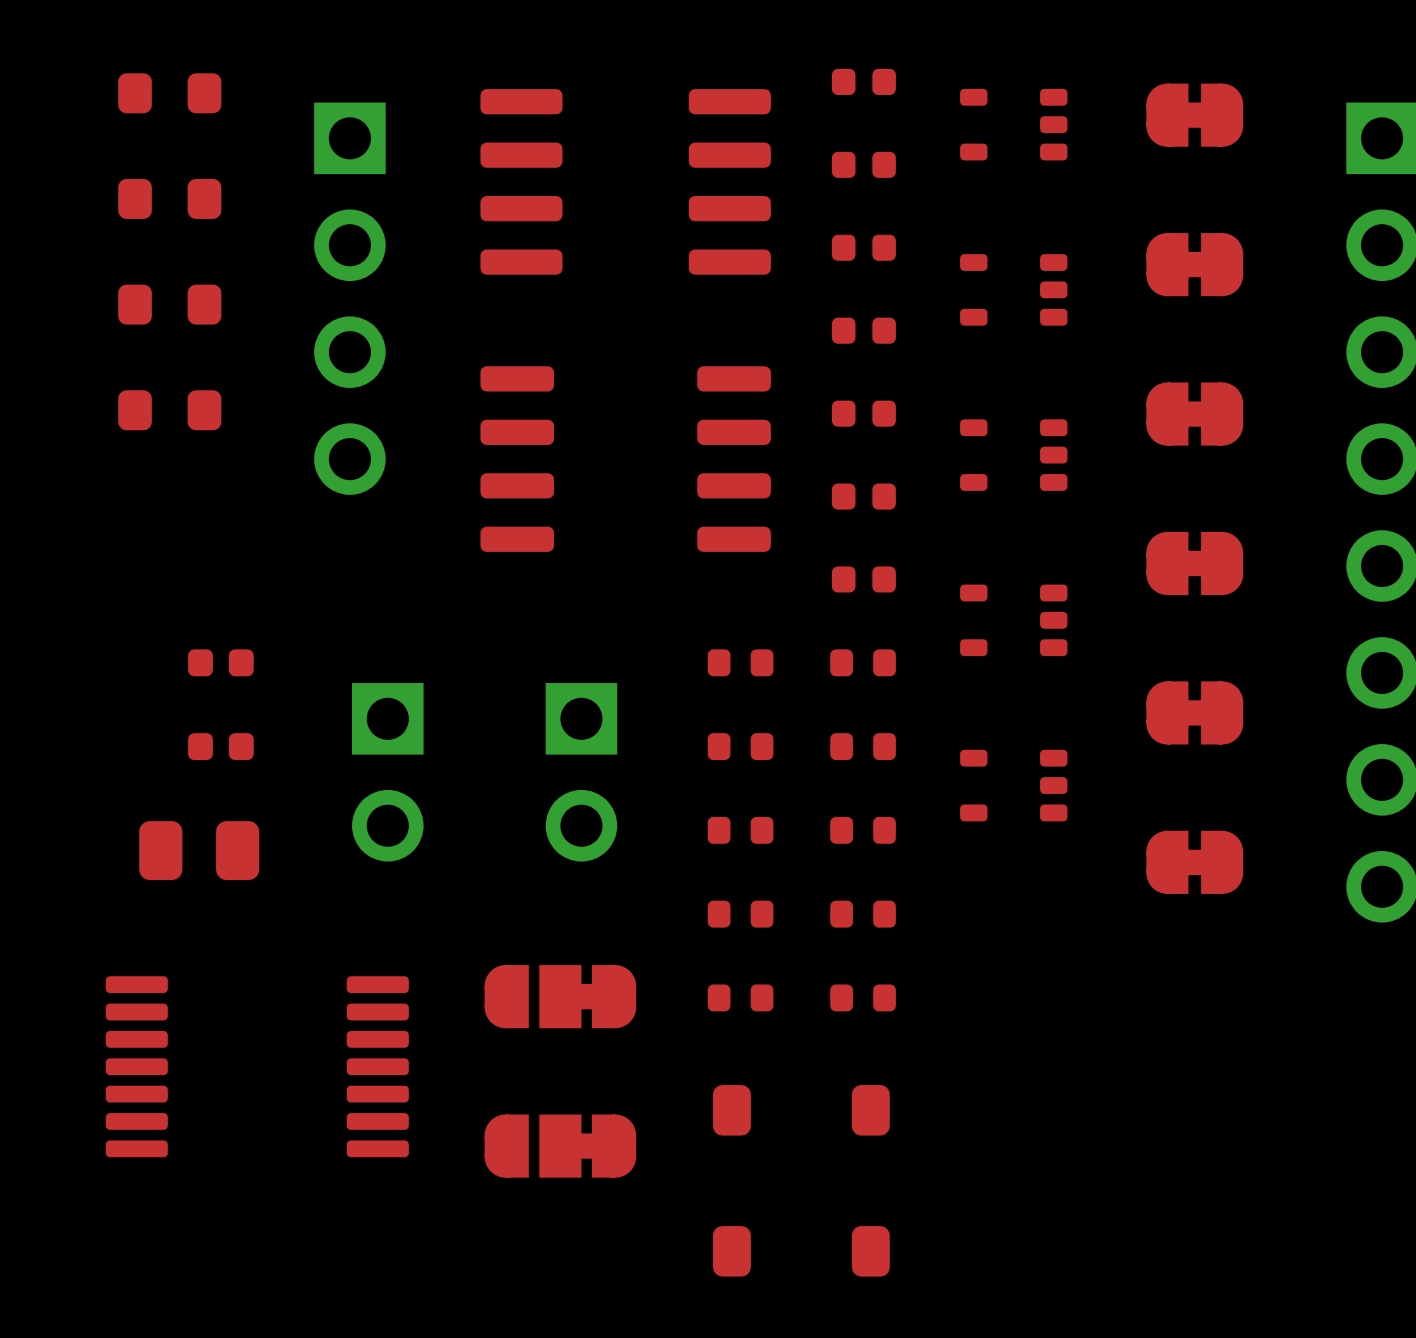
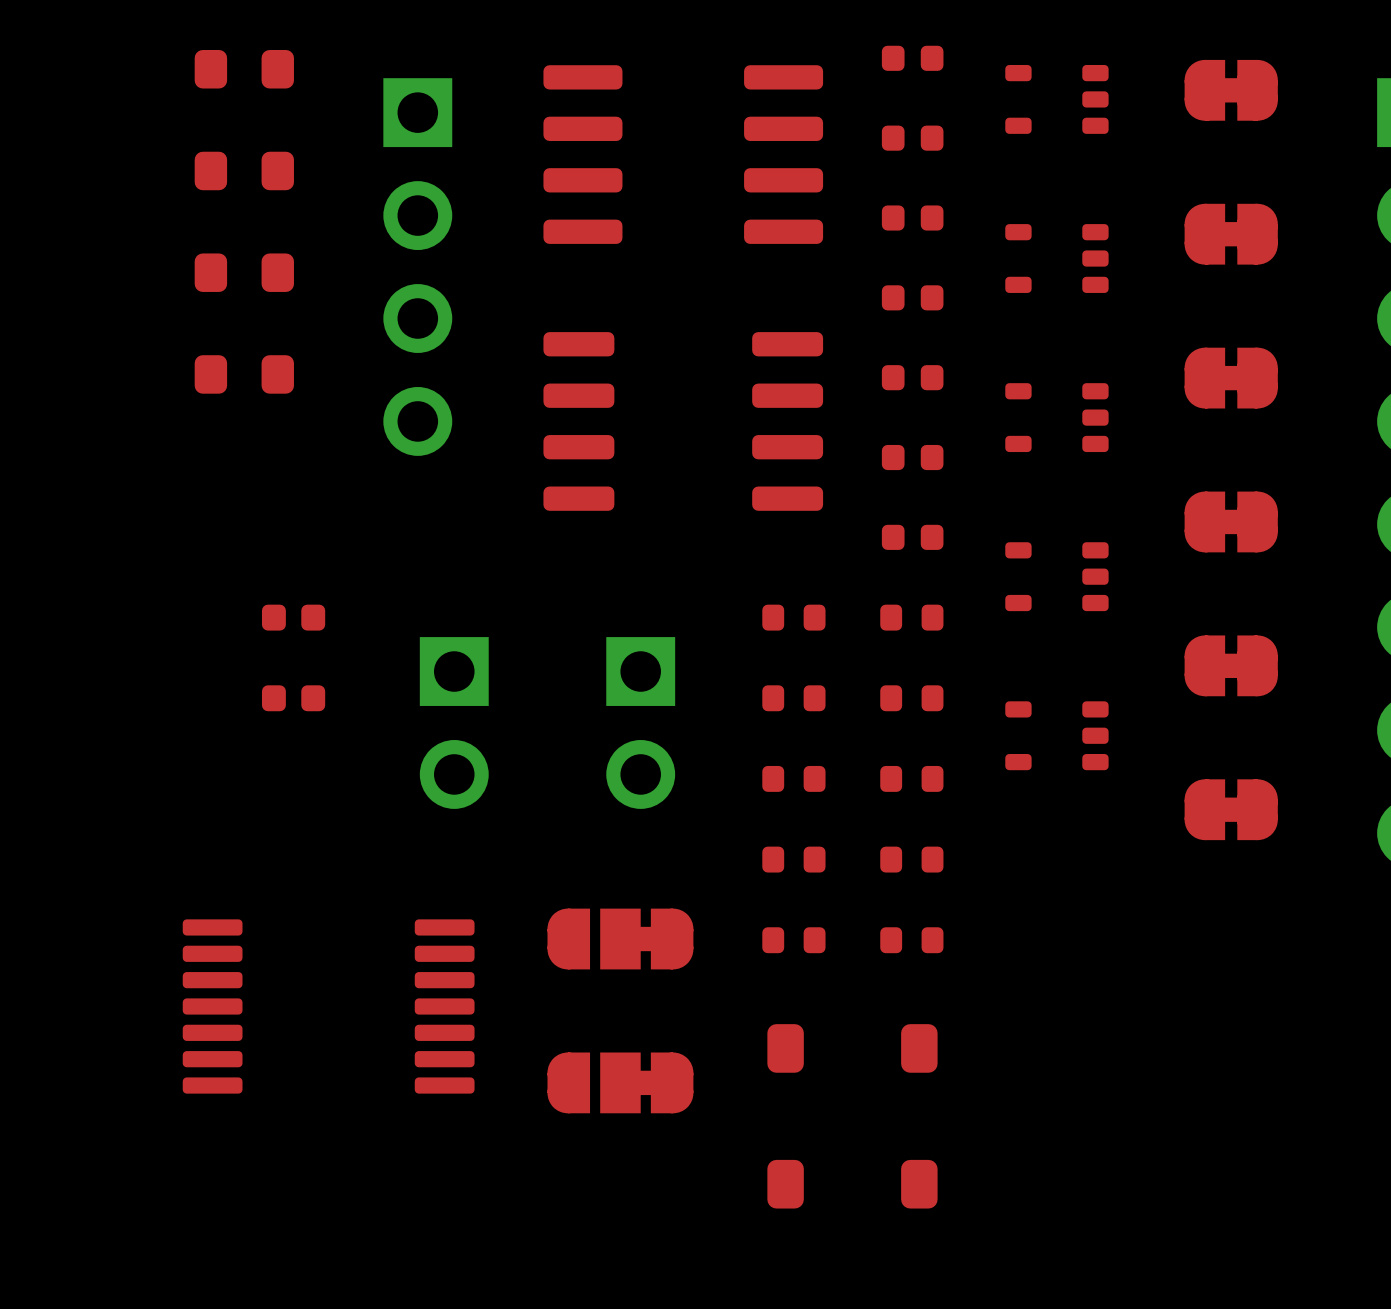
part: (199, 850) -> none

